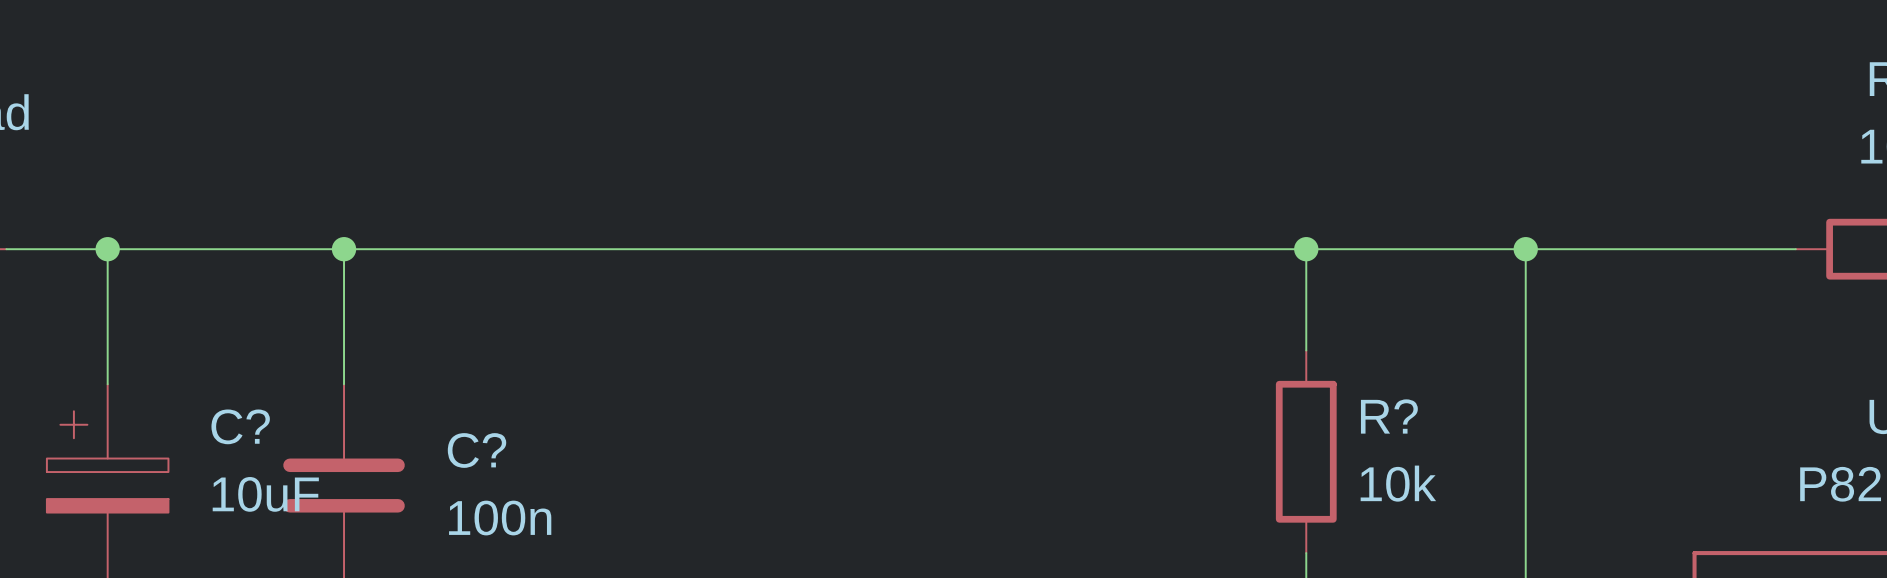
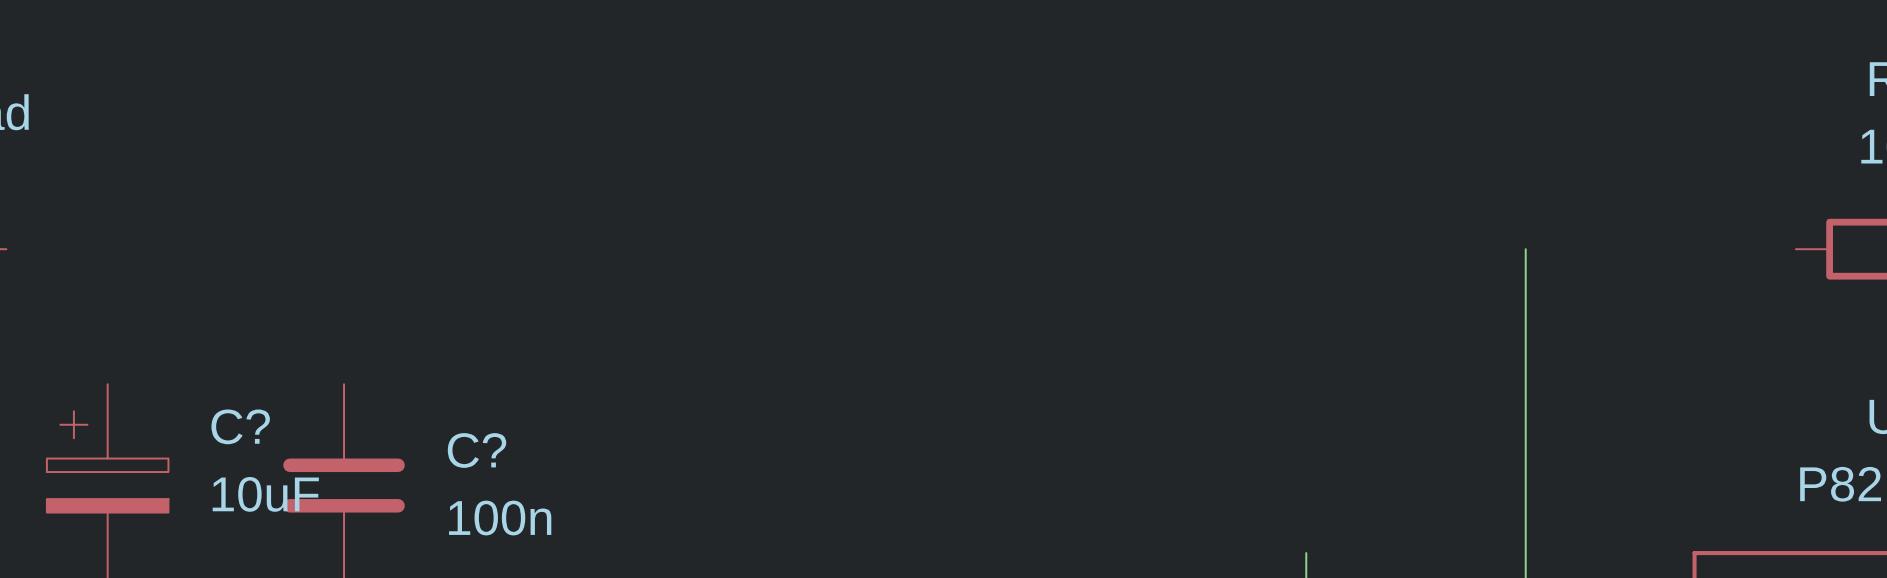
wire: (6, 249) (1795, 249) -> none
wire: (107, 249) (107, 384) -> none
junction: (107, 249) -> none
wire: (344, 249) (344, 384) -> none
junction: (344, 249) -> none
wire: (1306, 249) (1306, 350) -> none
junction: (1306, 249) -> none
junction: (1525, 249) -> none
R?: 10k (1306, 451) -> none

